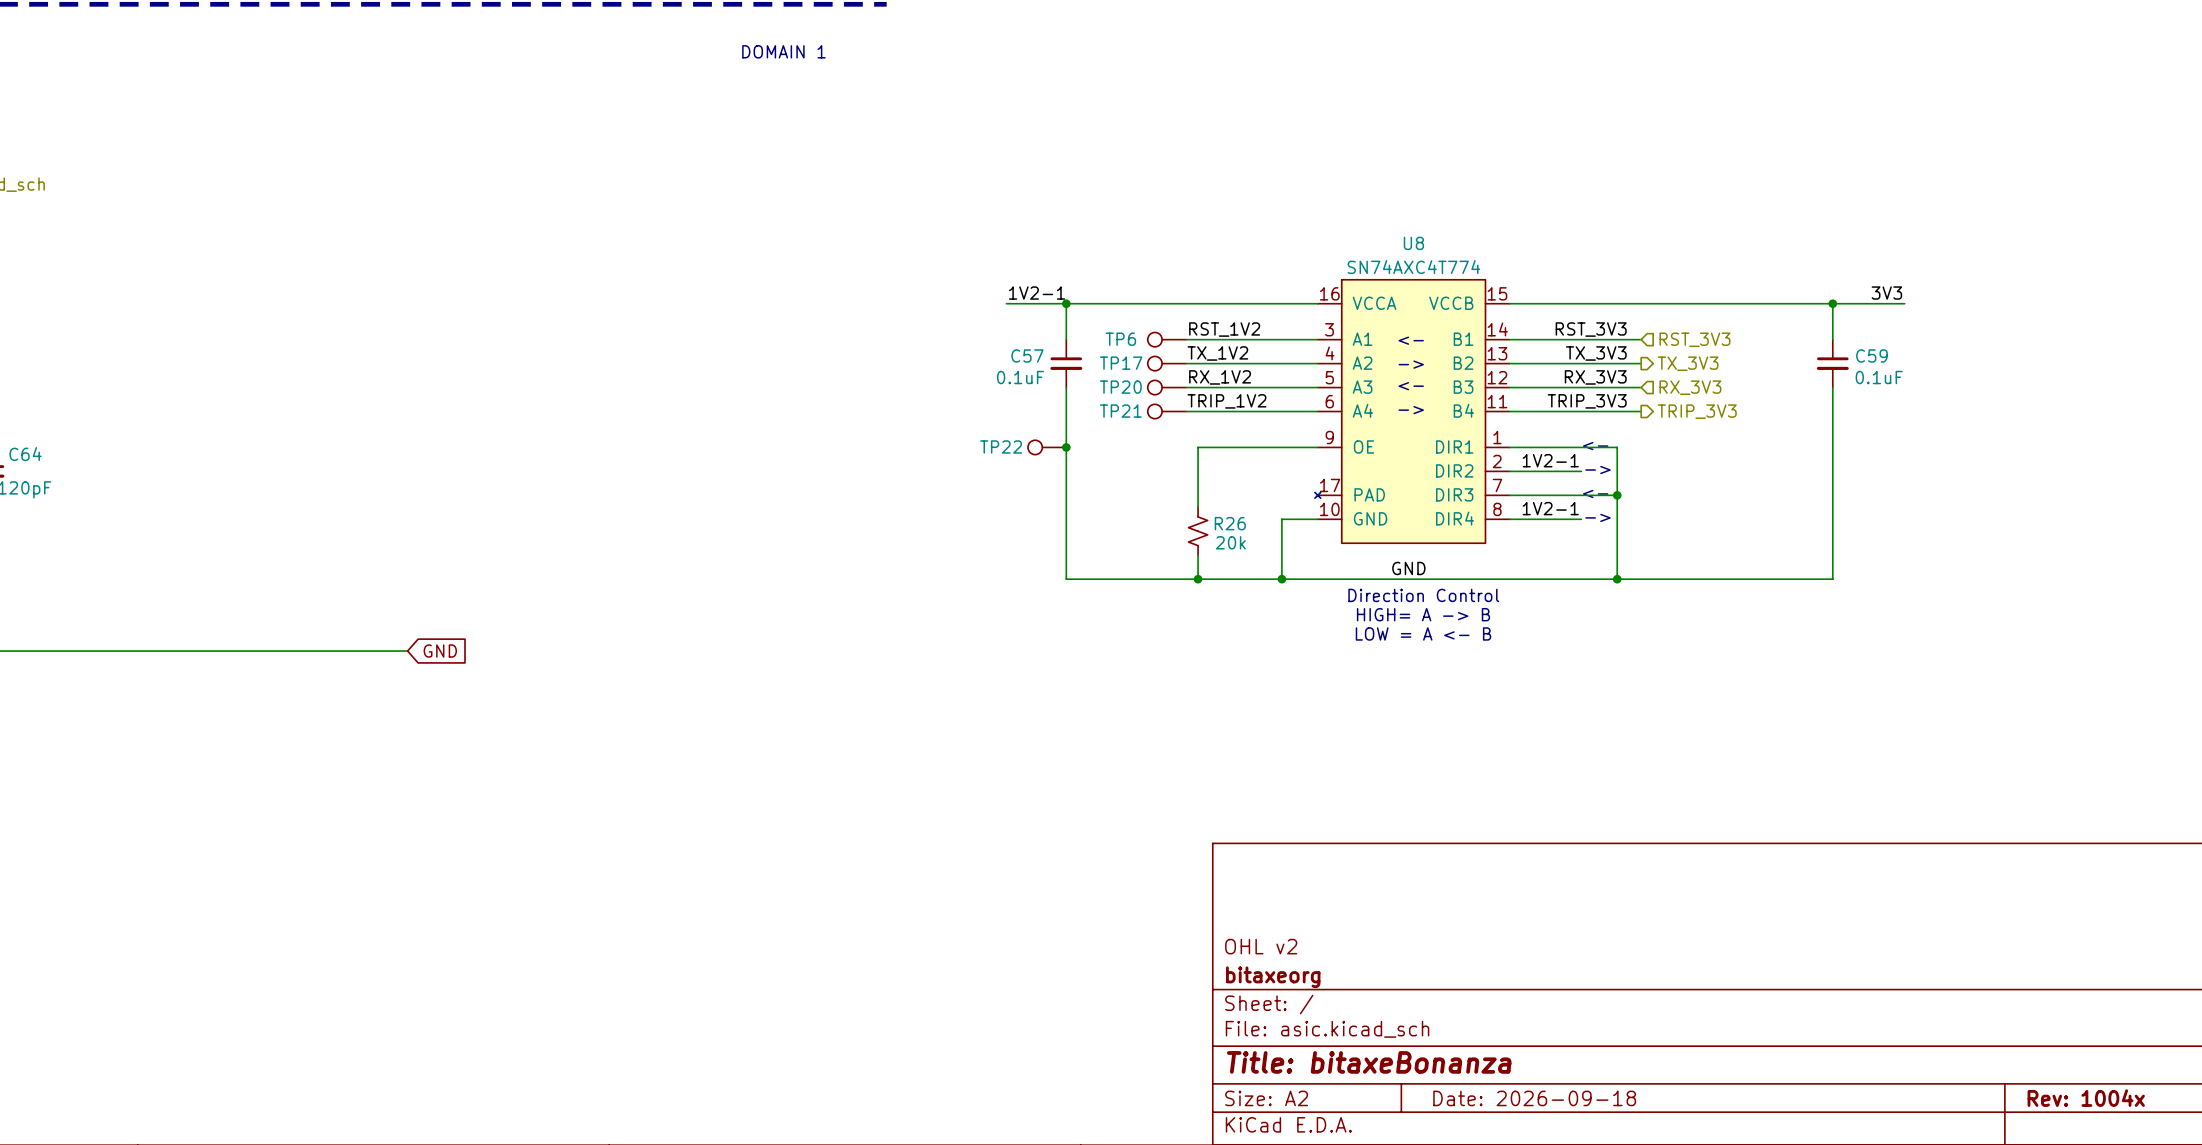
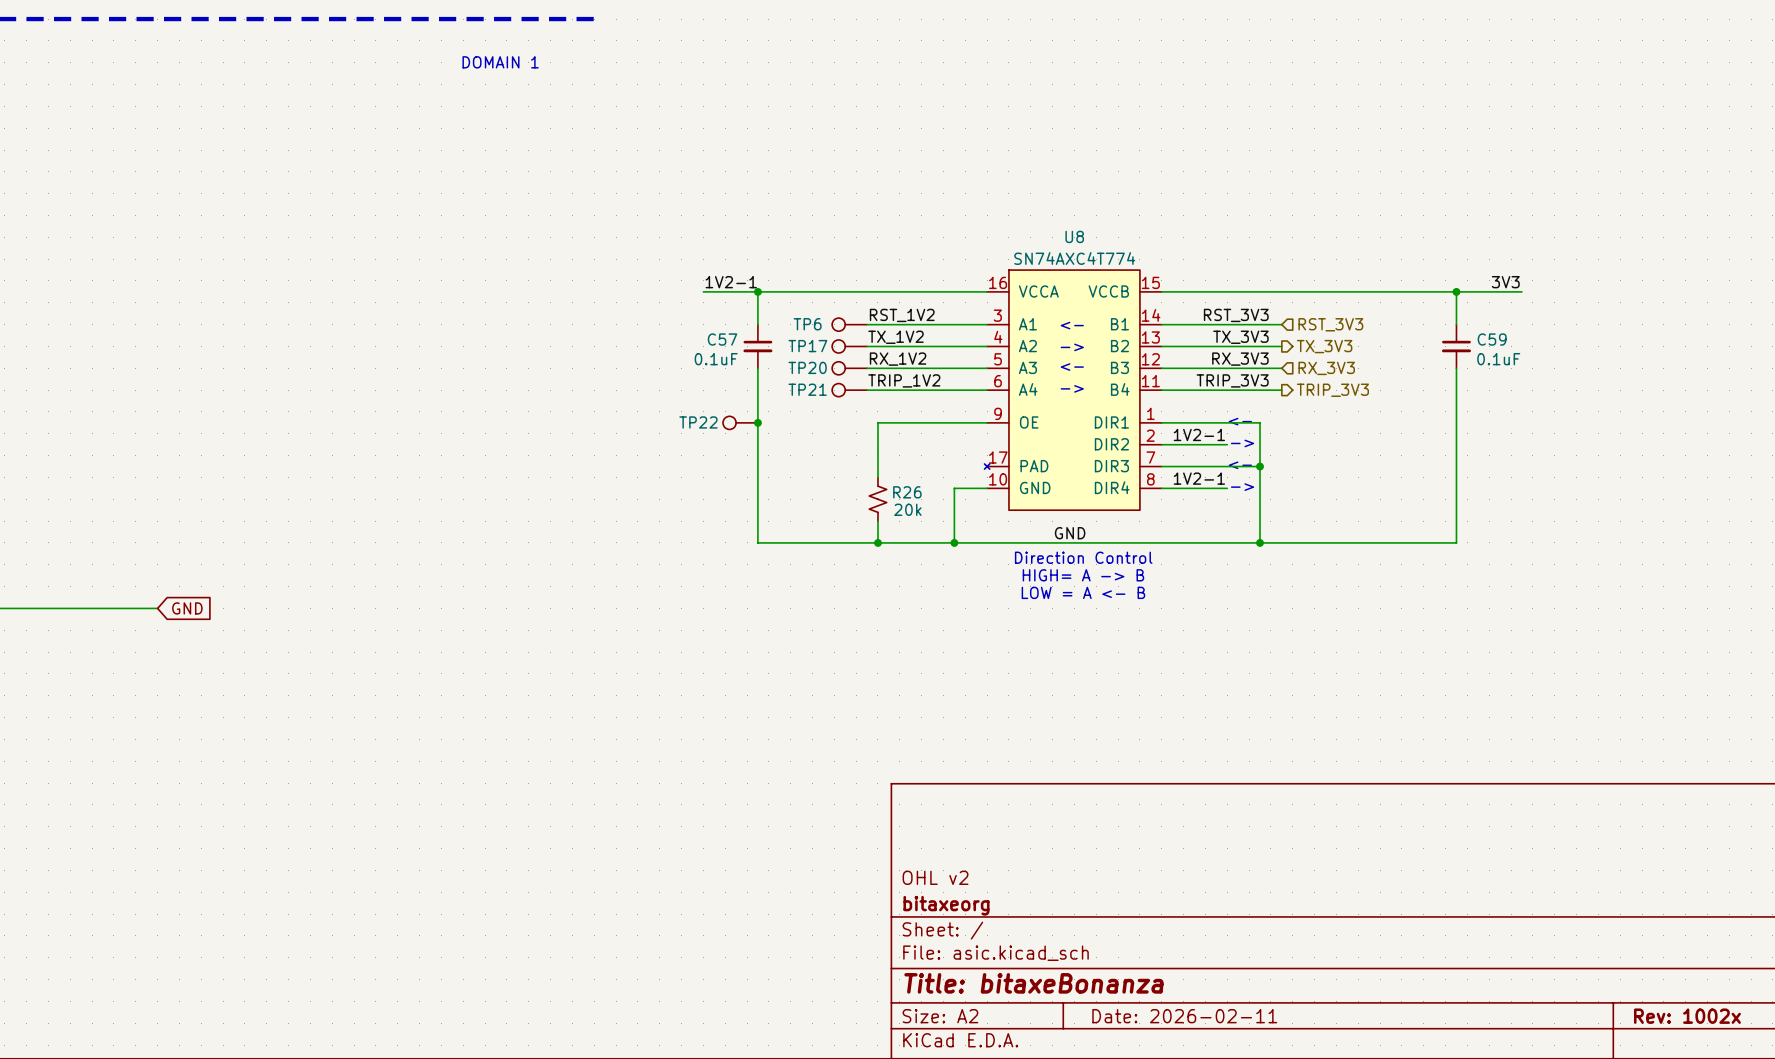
title block: Date: 2026-09-18 (1534, 1098) -> Date: 2026-02-11 (1184, 1016)
title block: Rev: 1004x (2086, 1098) -> Rev: 1002x (1687, 1016)

